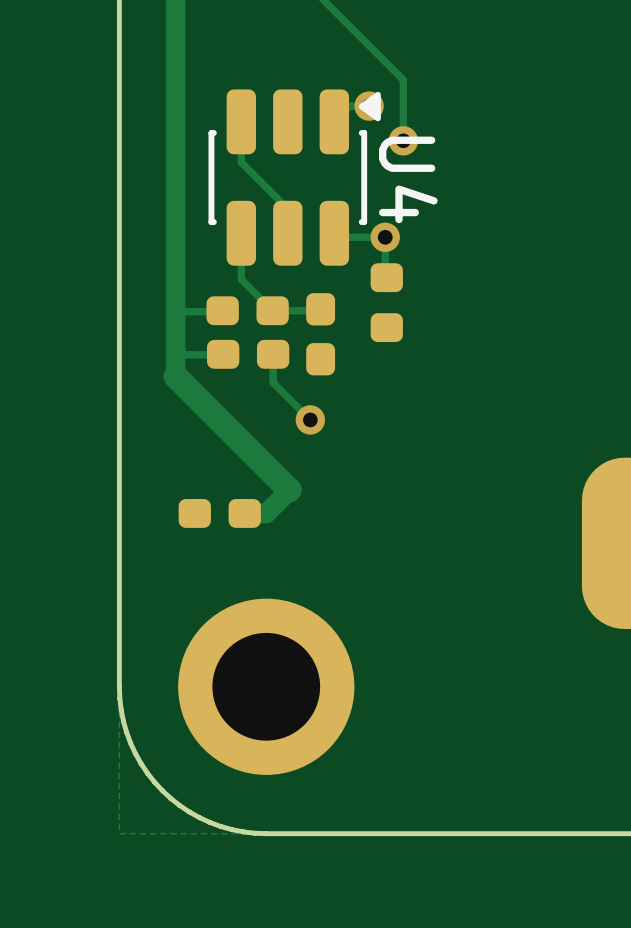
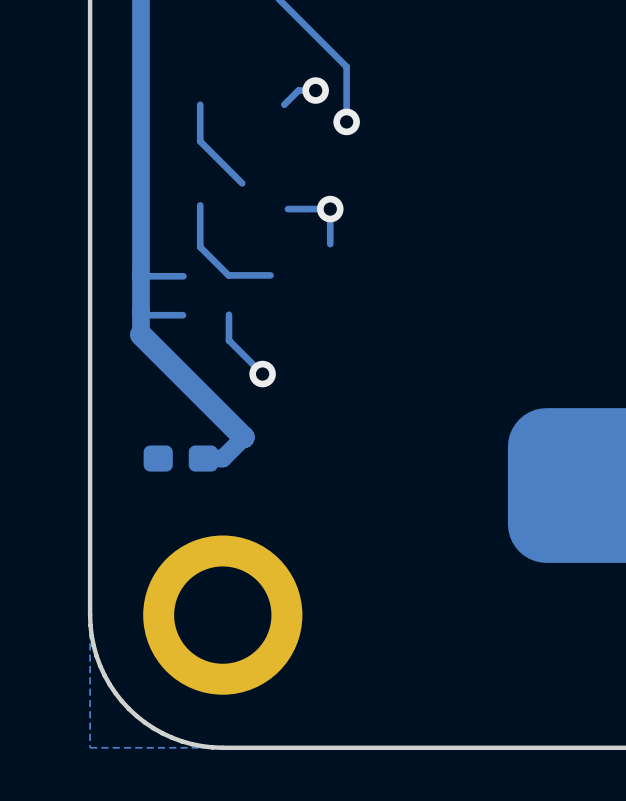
U4: (294, 177) -> none
part: (386, 302) -> none
part: (247, 310) -> none
part: (320, 334) -> none
part: (248, 354) -> none

